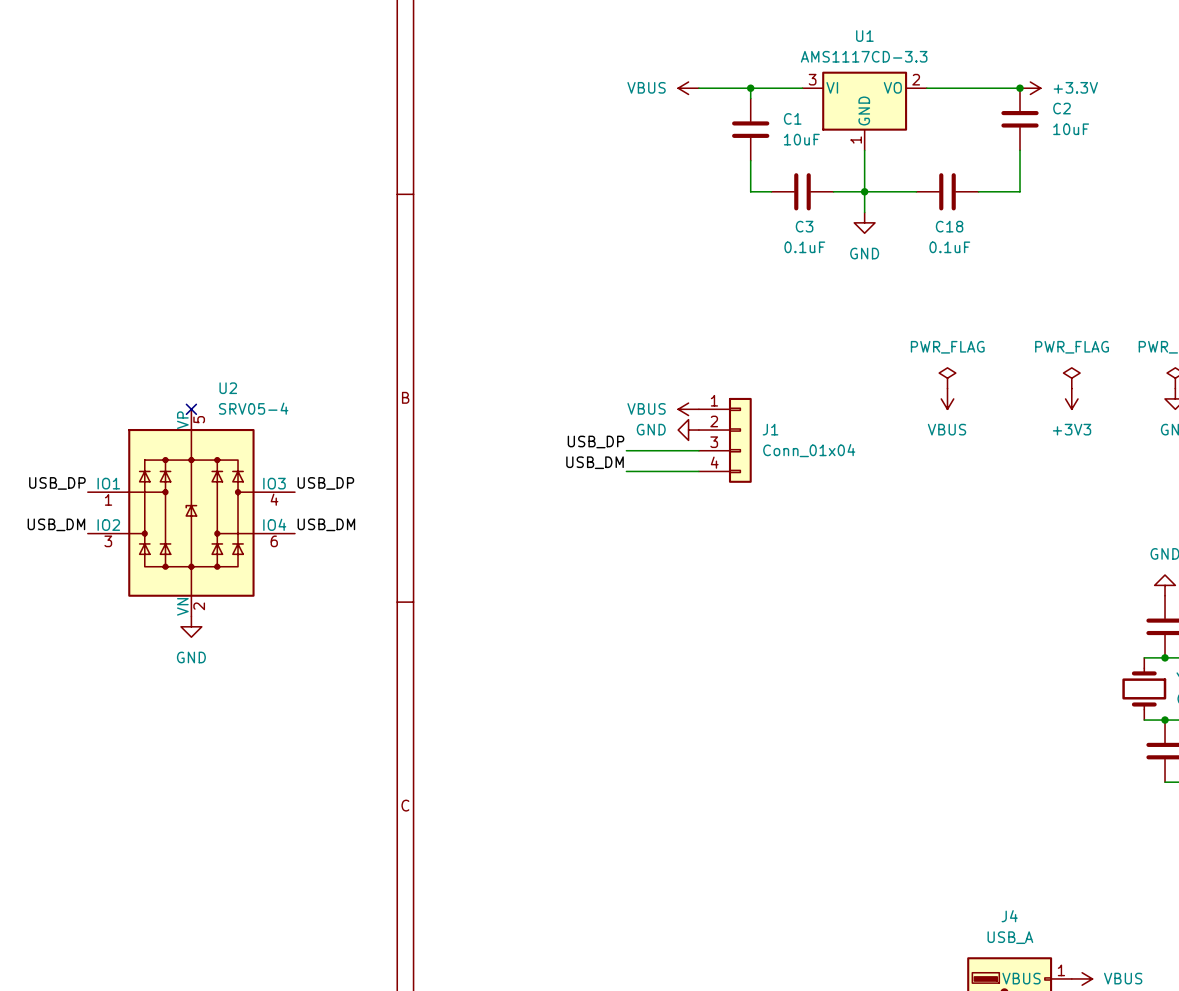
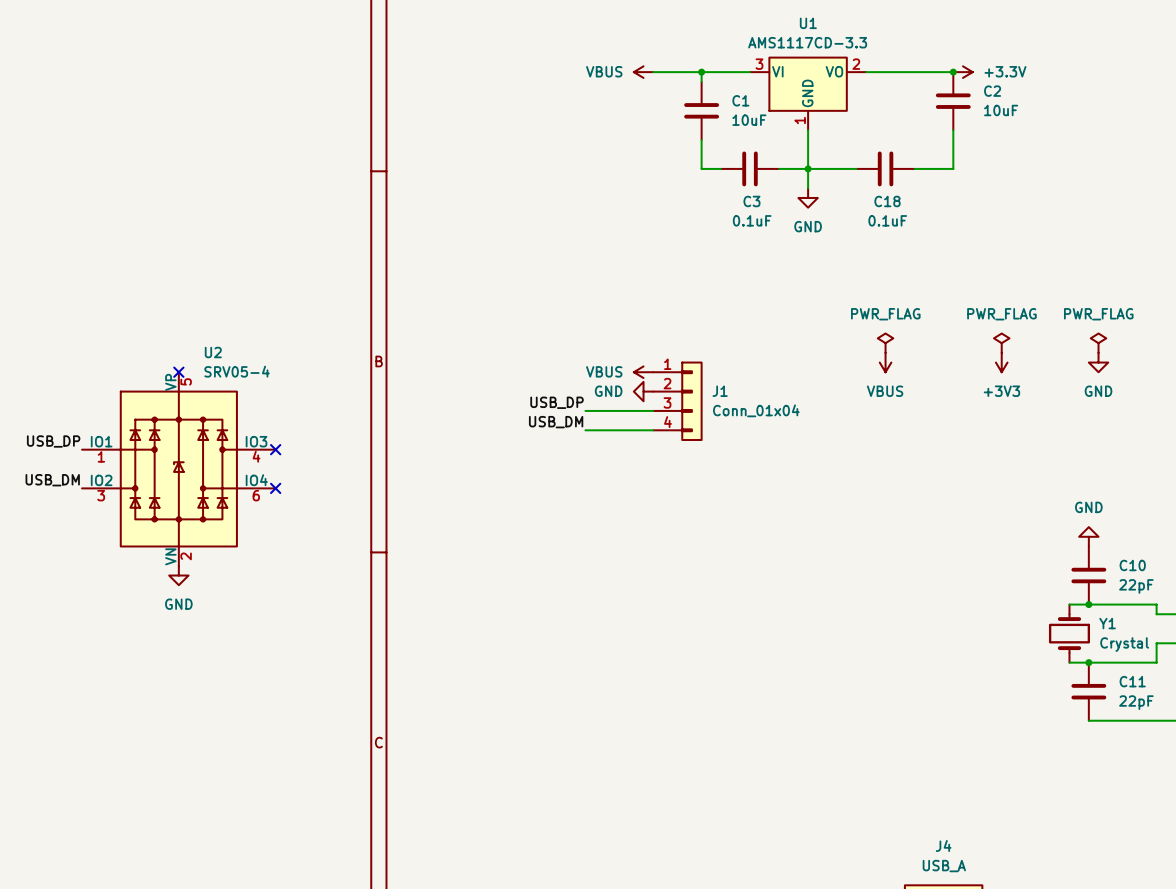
label: USB_DP (325, 483) -> none
no-connect mark: none -> (275, 449)
label: USB_DM (326, 524) -> none
no-connect mark: none -> (275, 488)

